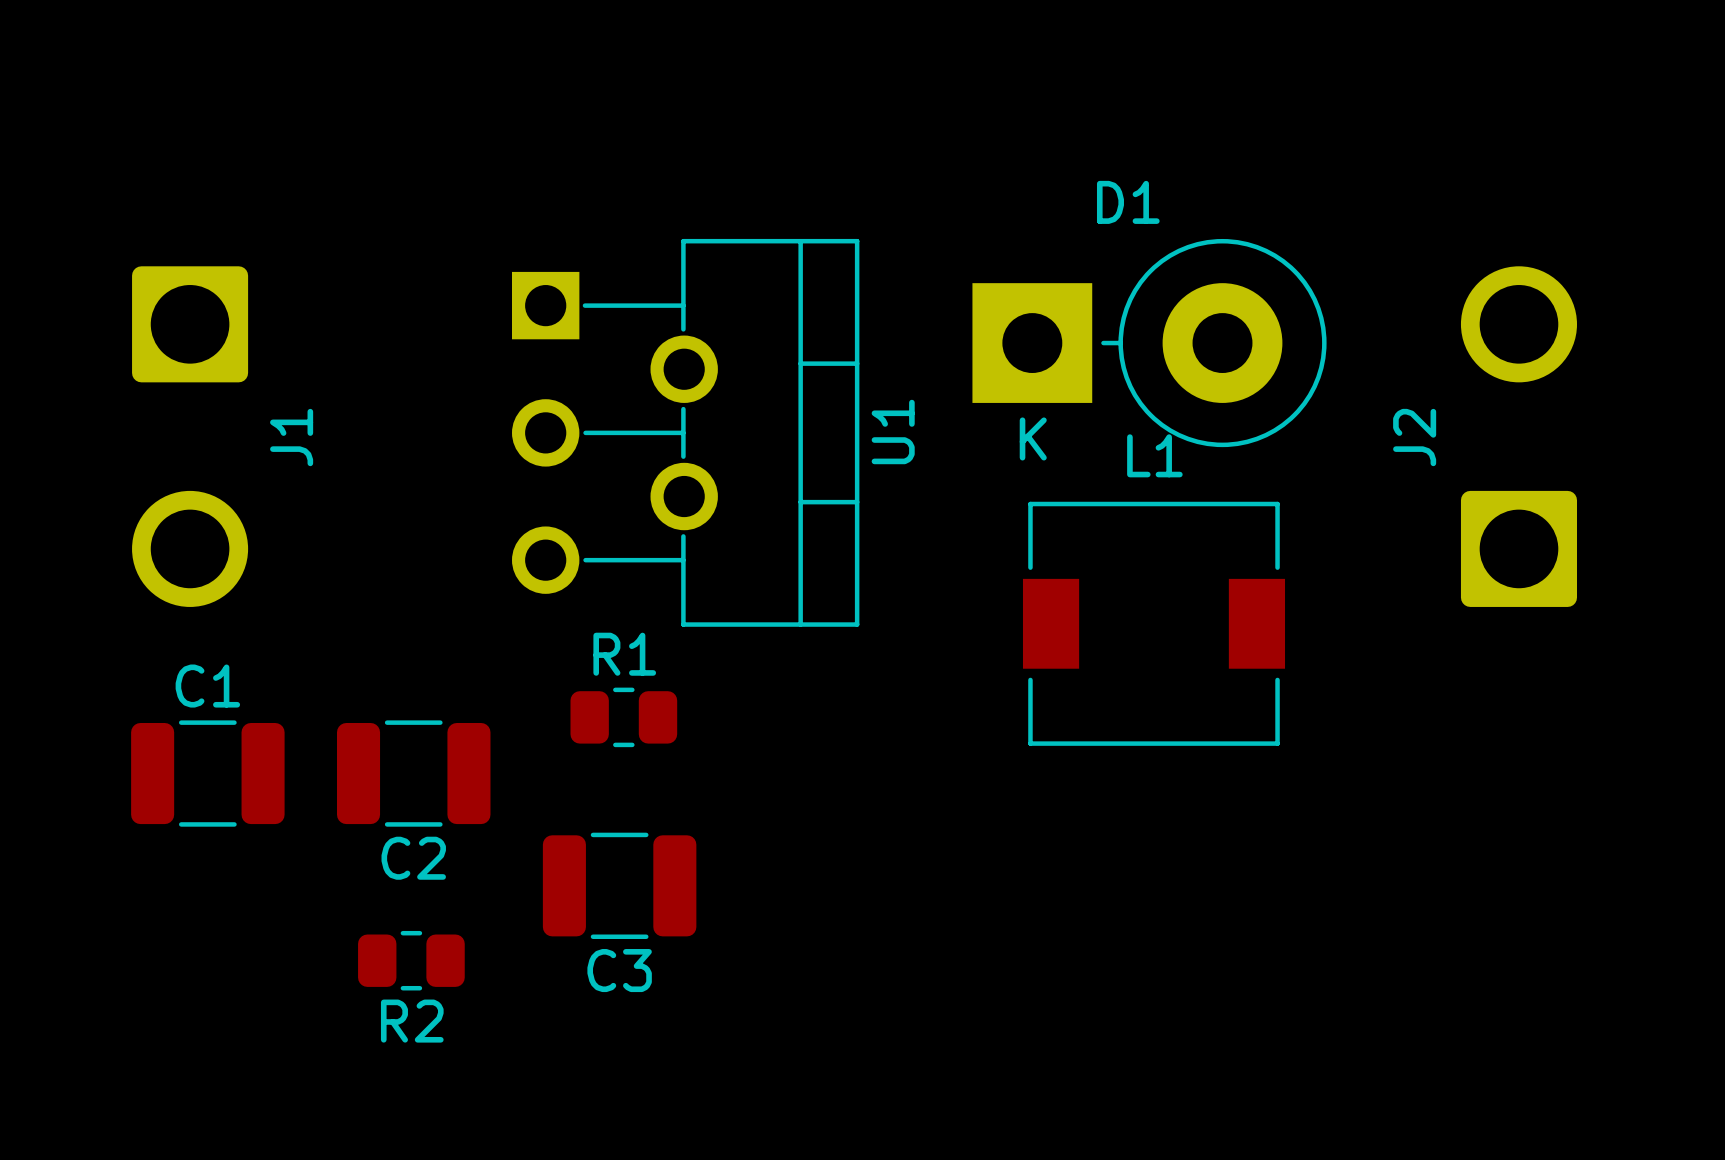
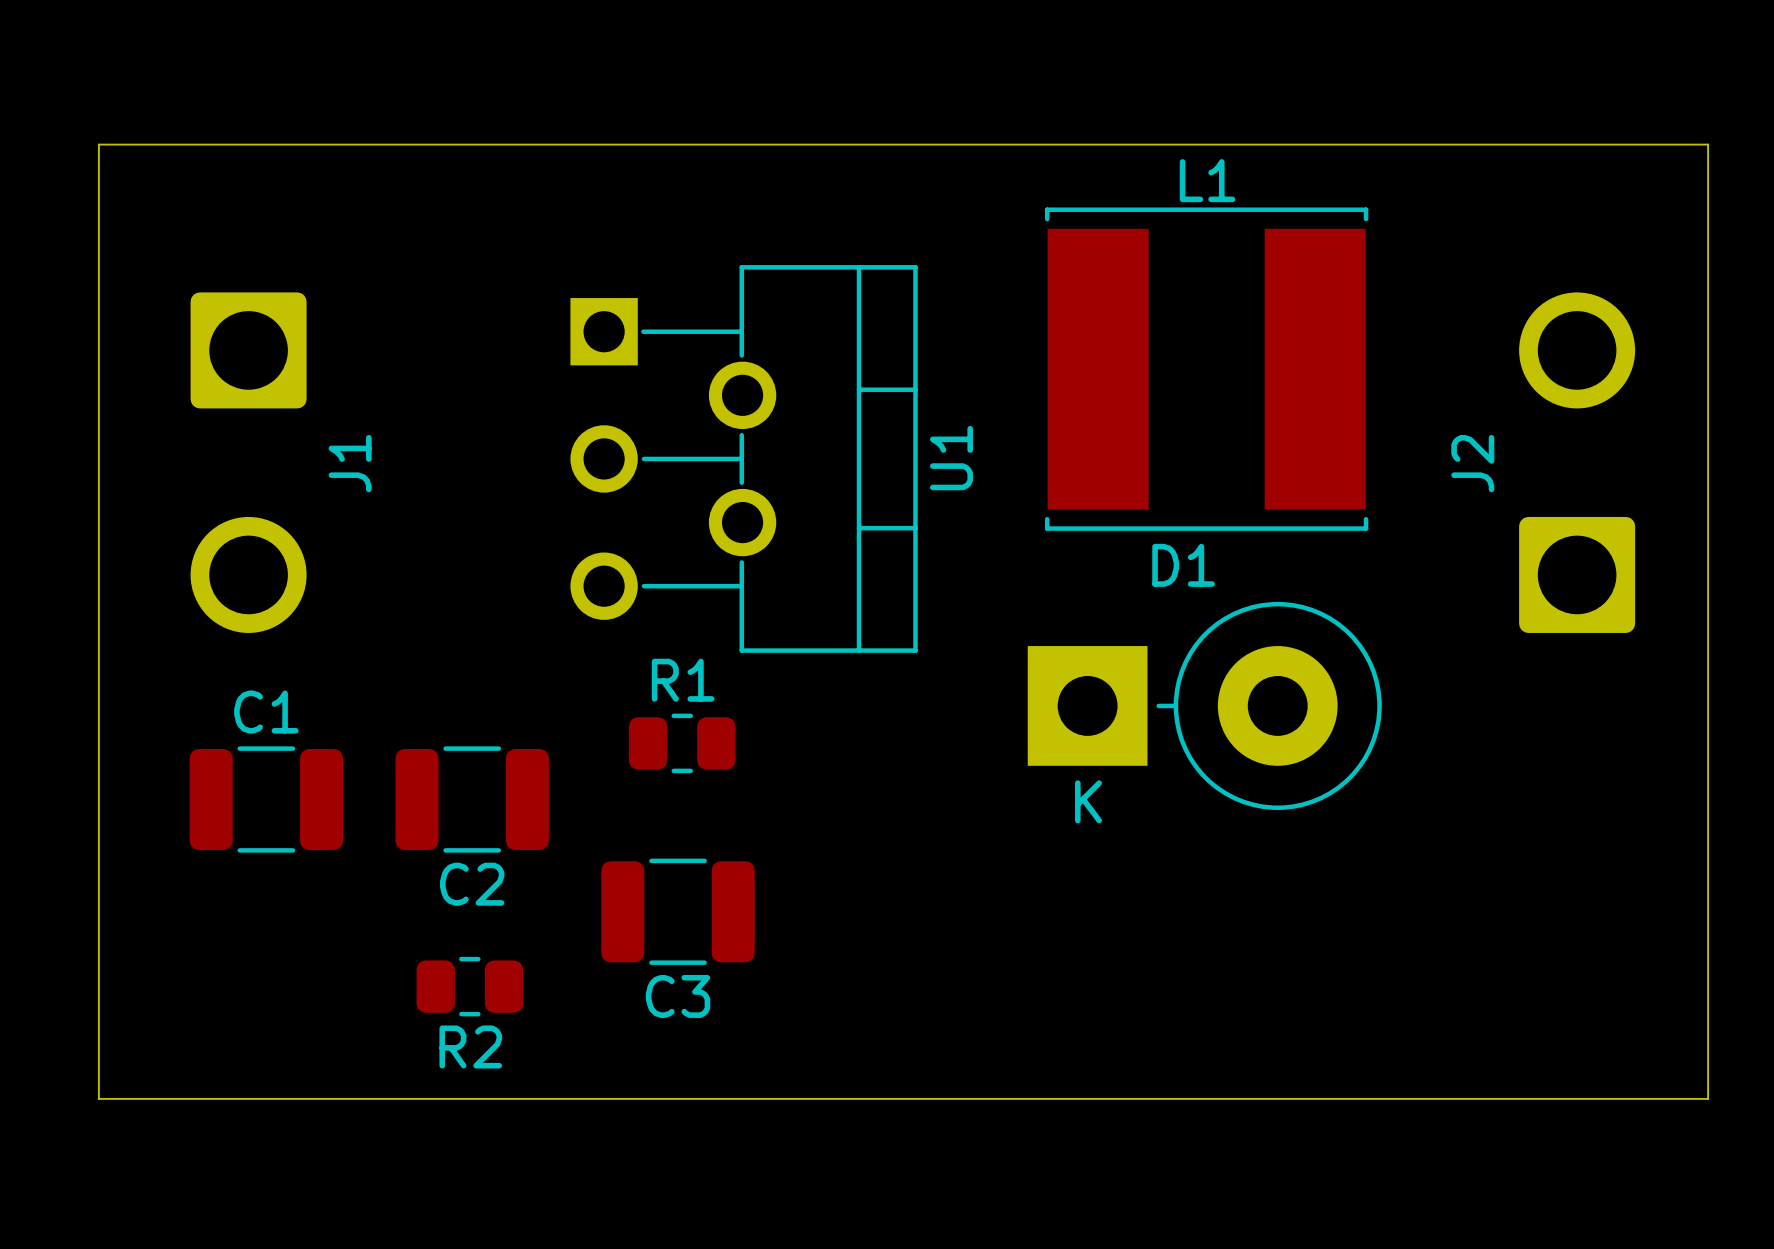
board edge: none -> (98, 144) (1708, 144) (1708, 1098) (98, 1098) (98, 144)
D1 position: (1149, 343) -> (1204, 705)
L1 footprint: [1022, 501, 1286, 746] -> [1044, 207, 1369, 531]

